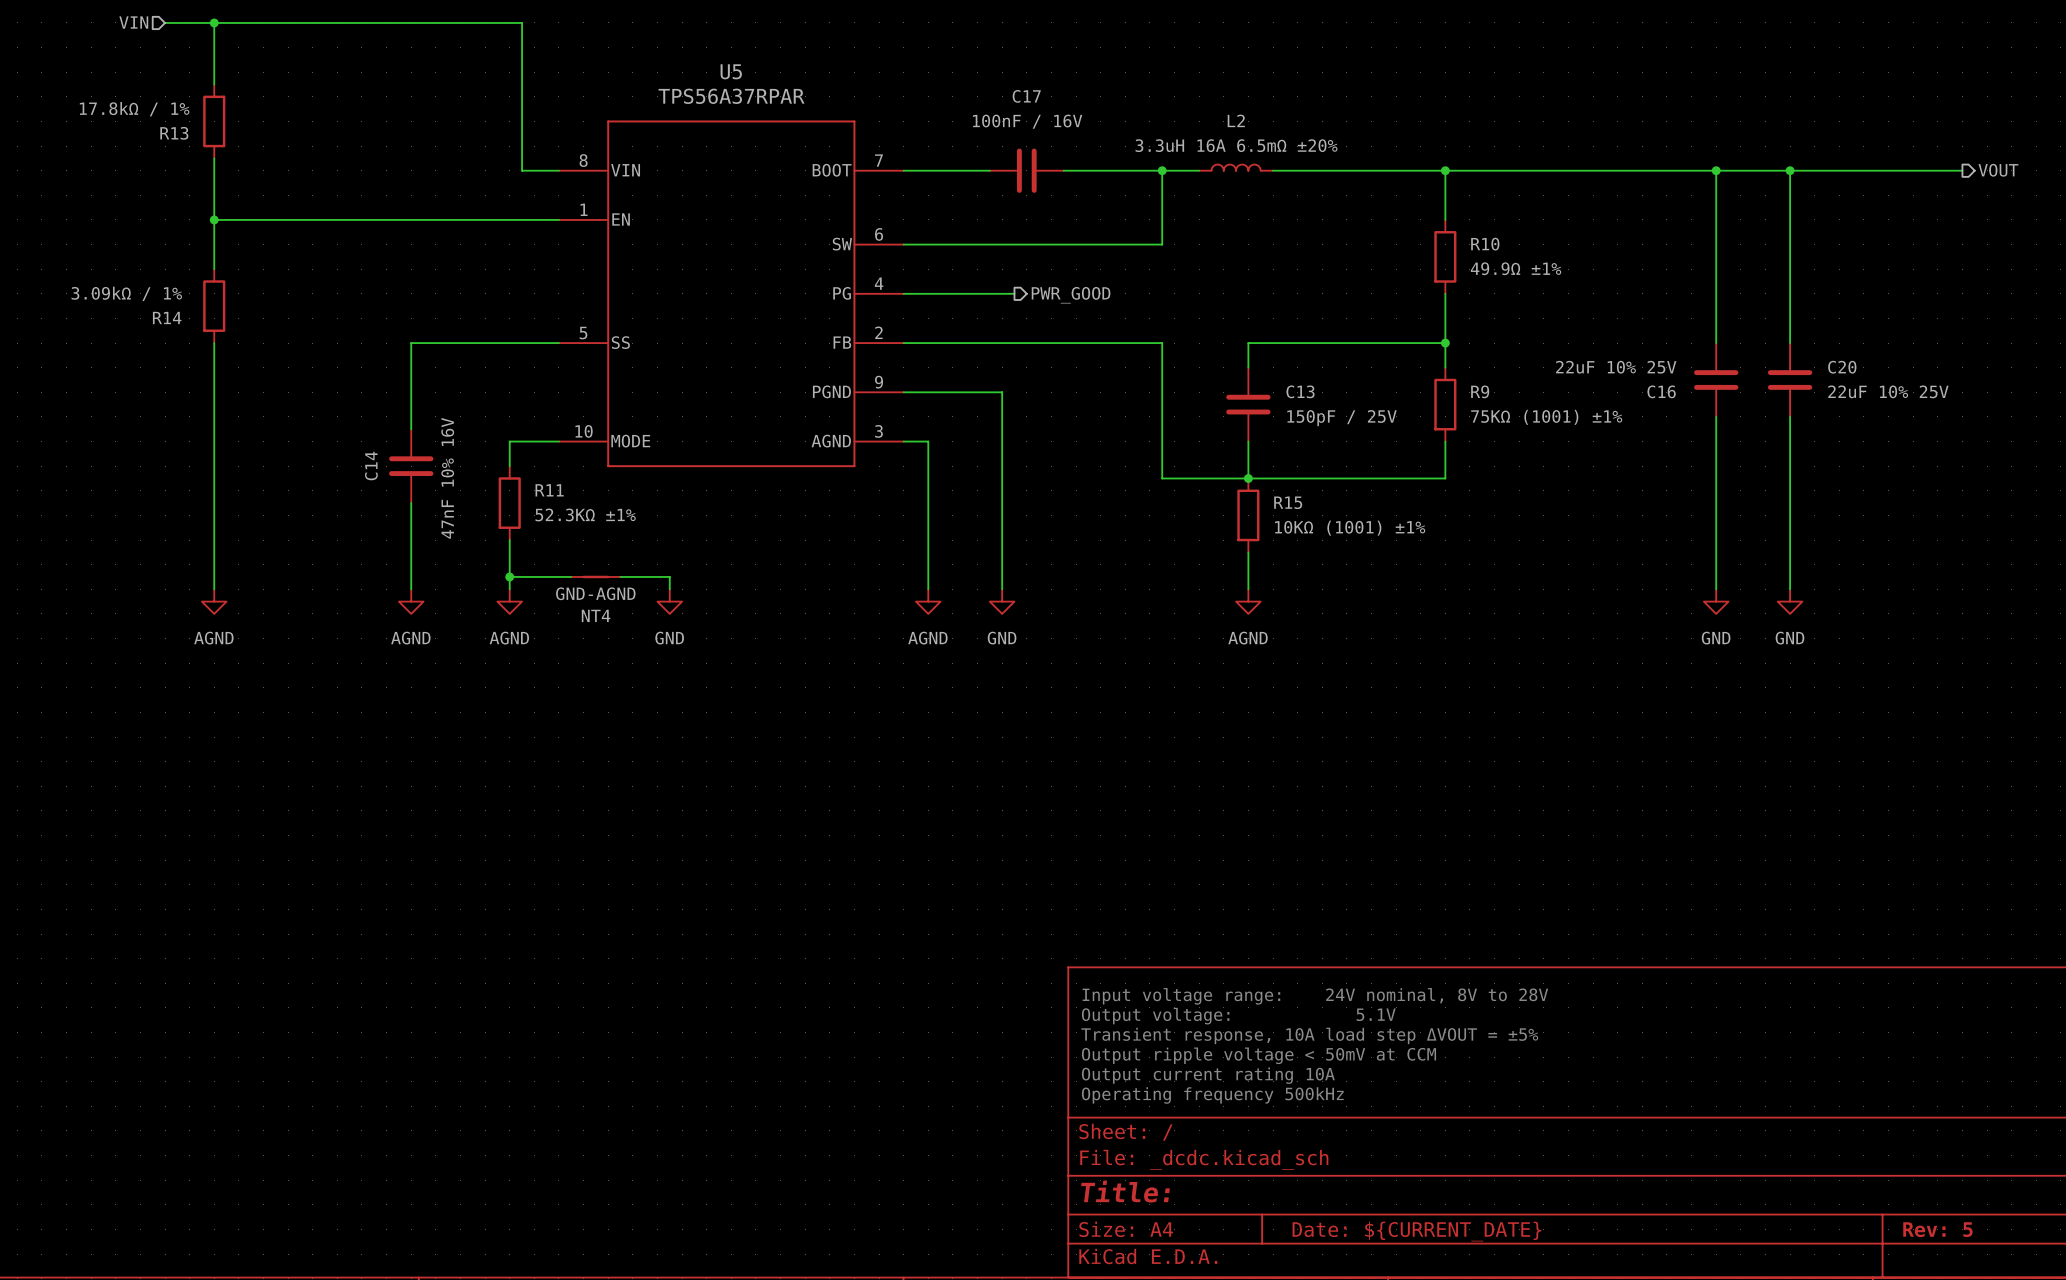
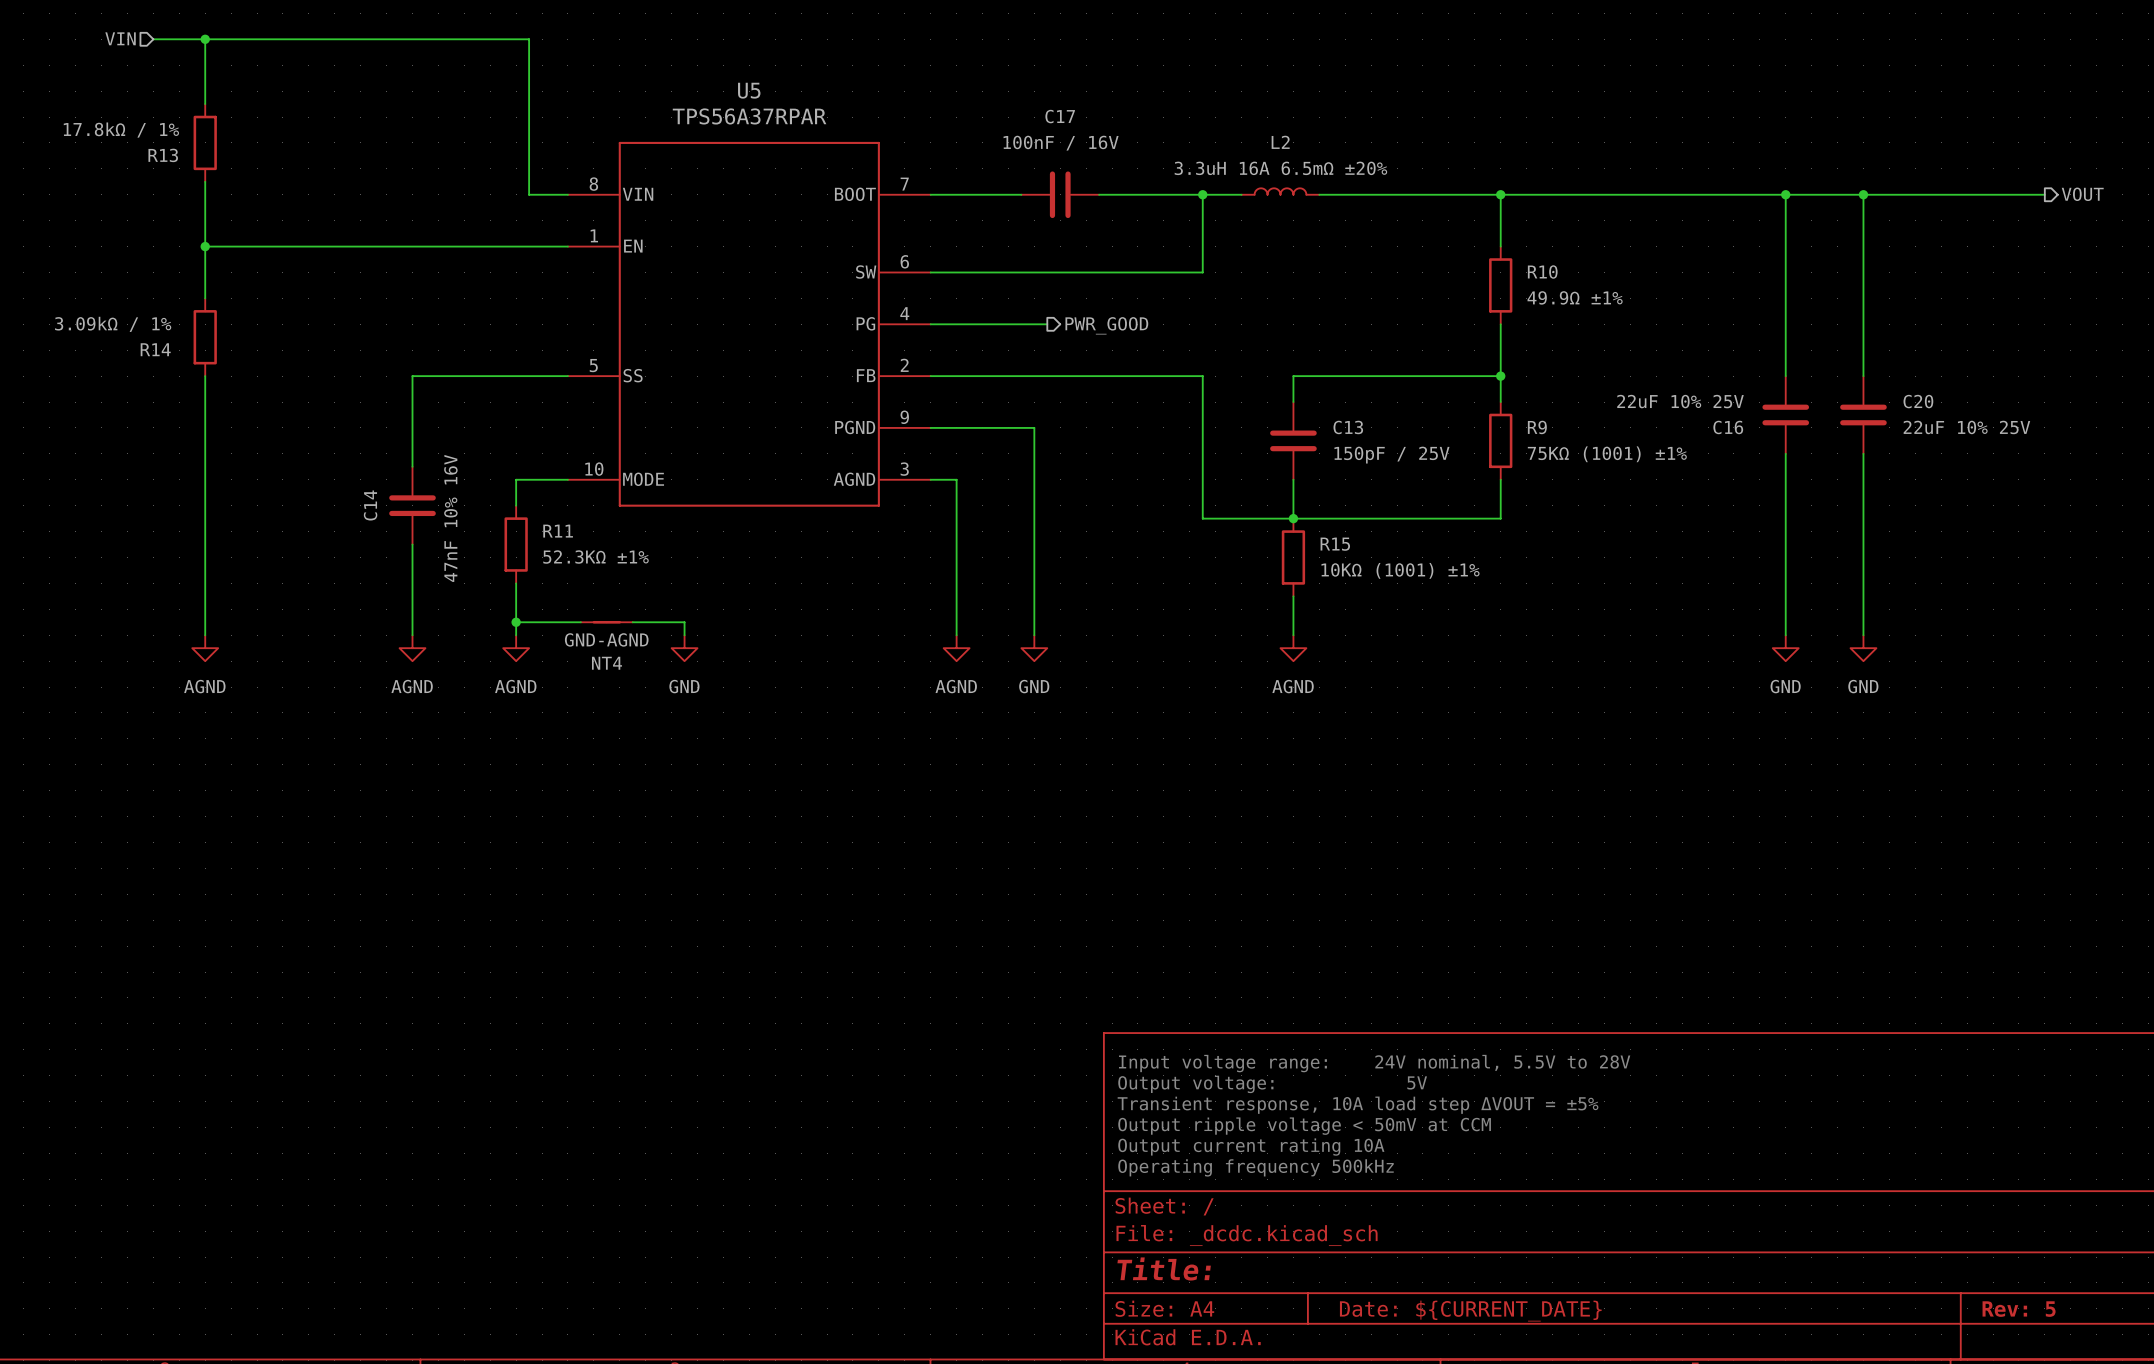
text: Input voltage range: 24V nominal, 8V to 28V (1315, 996) -> Input voltage range: 24V nominal, 5.5V to 28V (1374, 1063)
text: Output voltage: 5.1V (1238, 1016) -> Output voltage: 5V (1272, 1084)

